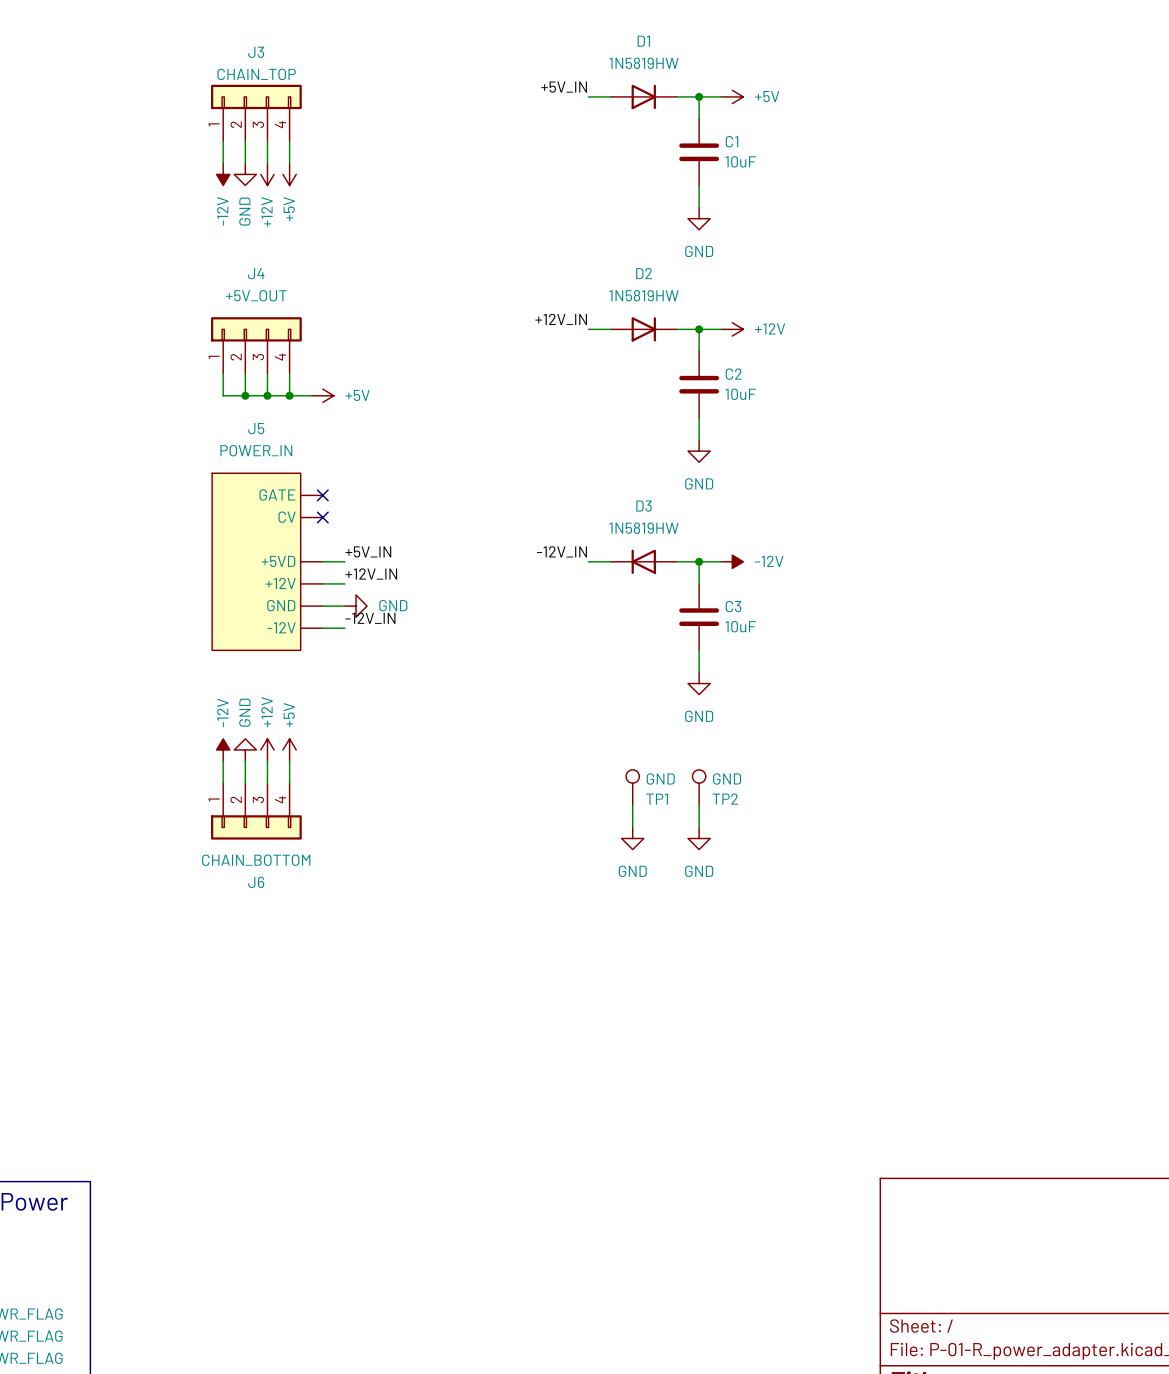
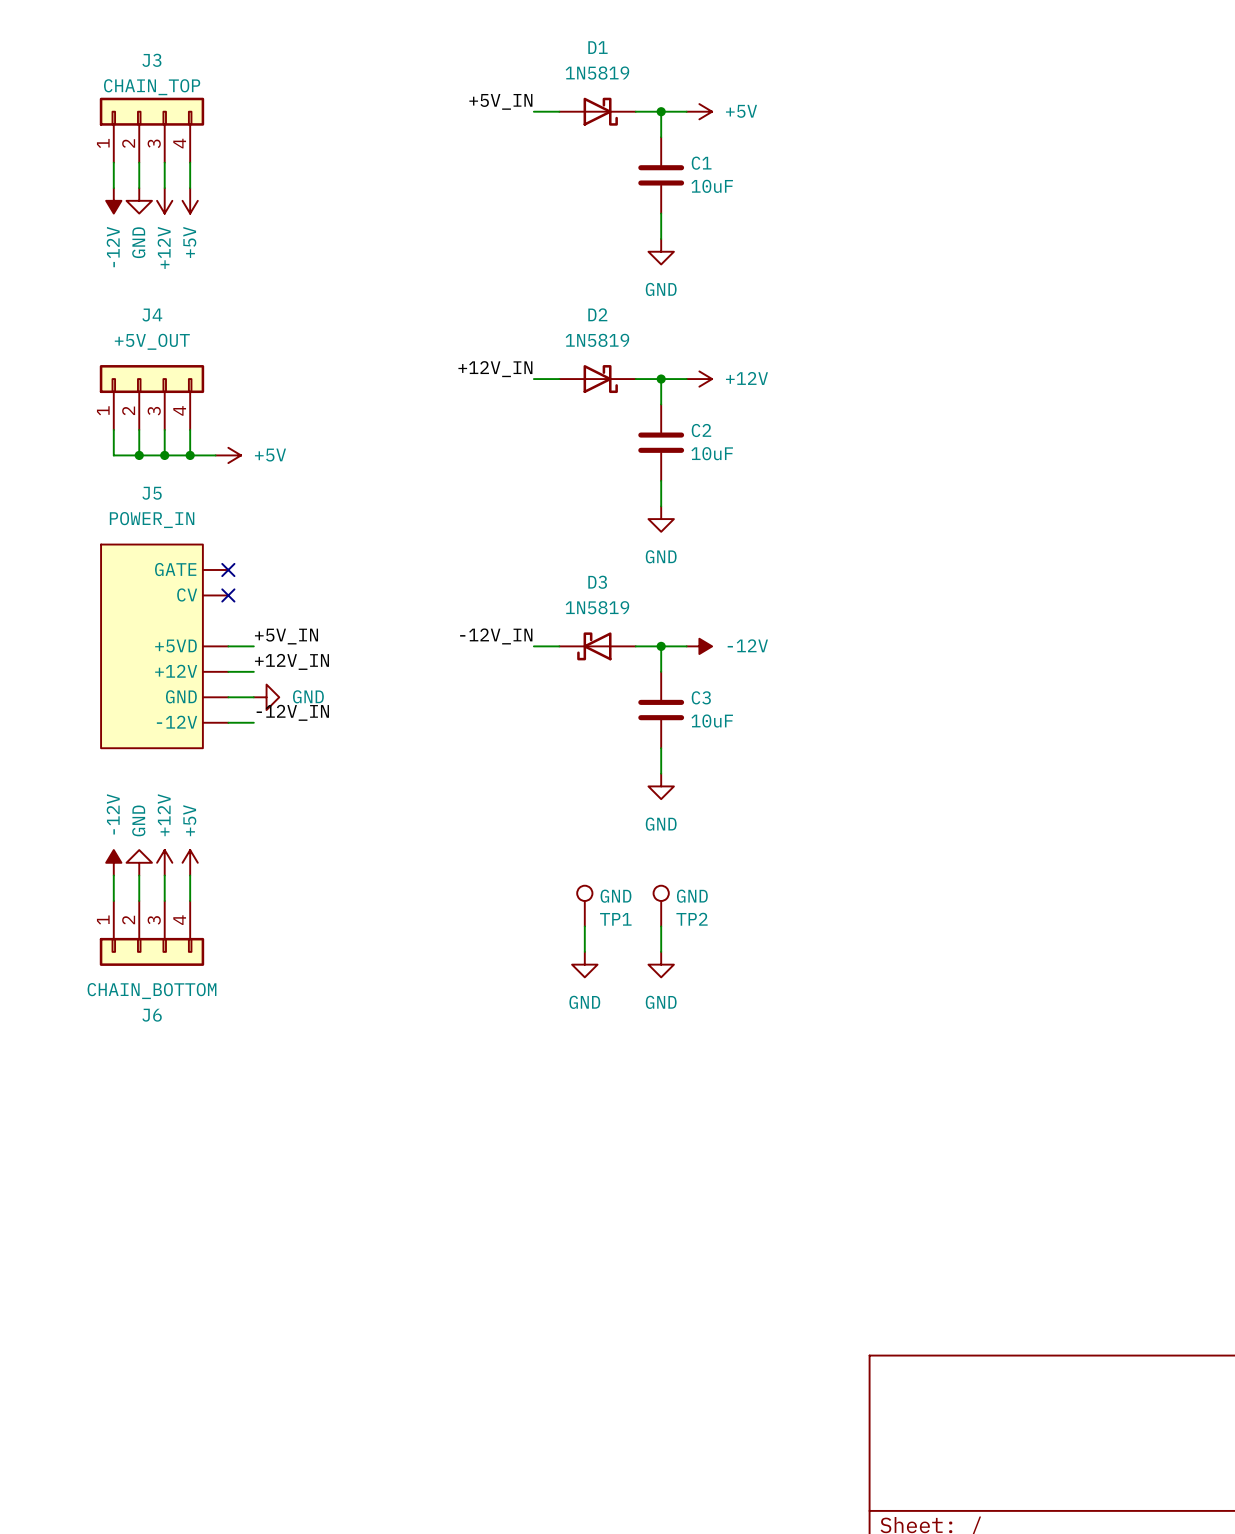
D1 value: 1N5819HW (644, 63) -> 1N5819 (597, 73)
D1 symbol: [610, 84, 677, 110] -> [559, 97, 636, 126]
D2 value: 1N5819HW (644, 295) -> 1N5819 (597, 340)
D2 symbol: [610, 317, 677, 342] -> [559, 365, 636, 394]
D3 value: 1N5819HW (644, 528) -> 1N5819 (597, 607)
D3 symbol: [610, 549, 677, 574] -> [559, 632, 636, 661]

